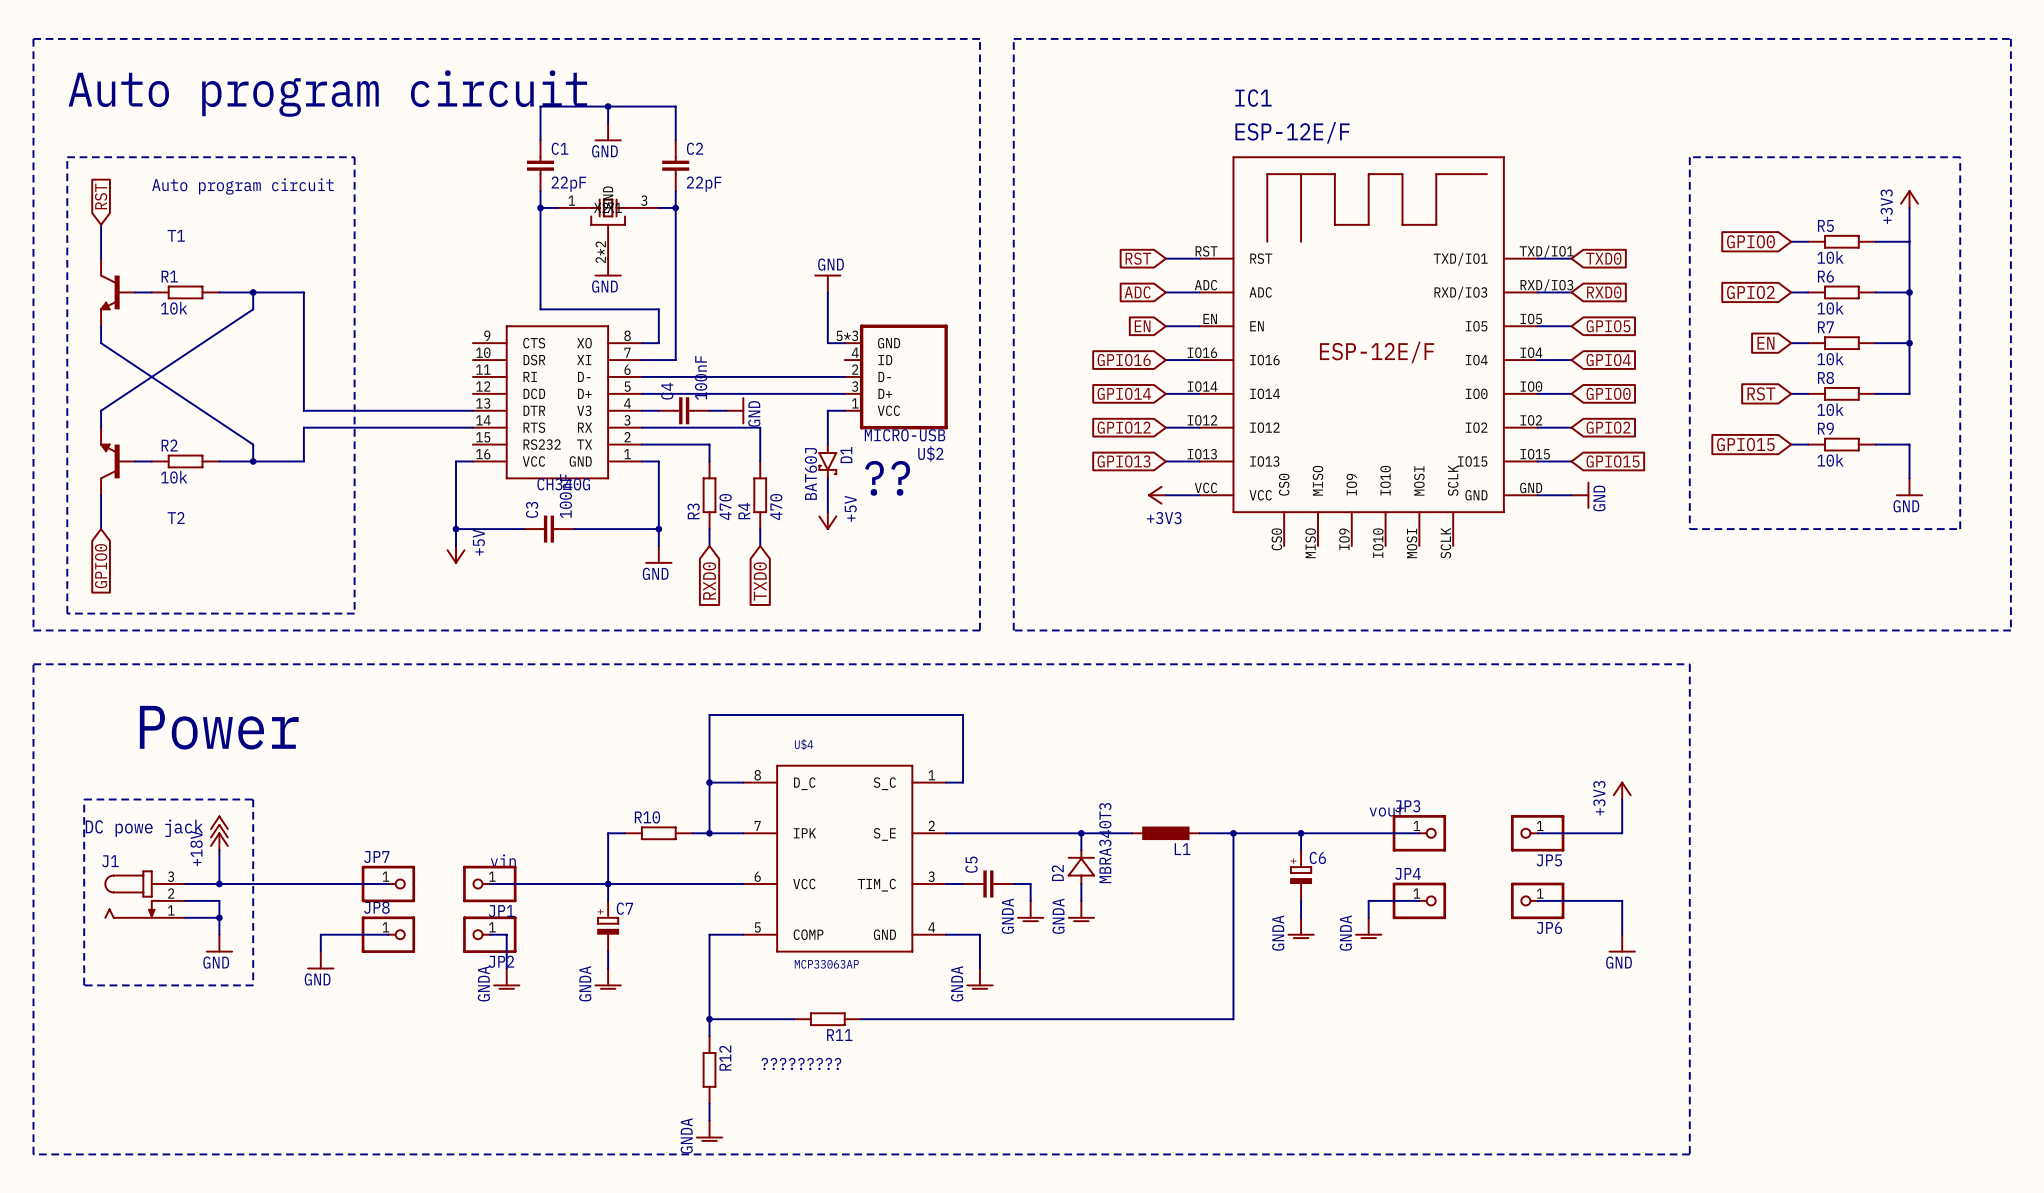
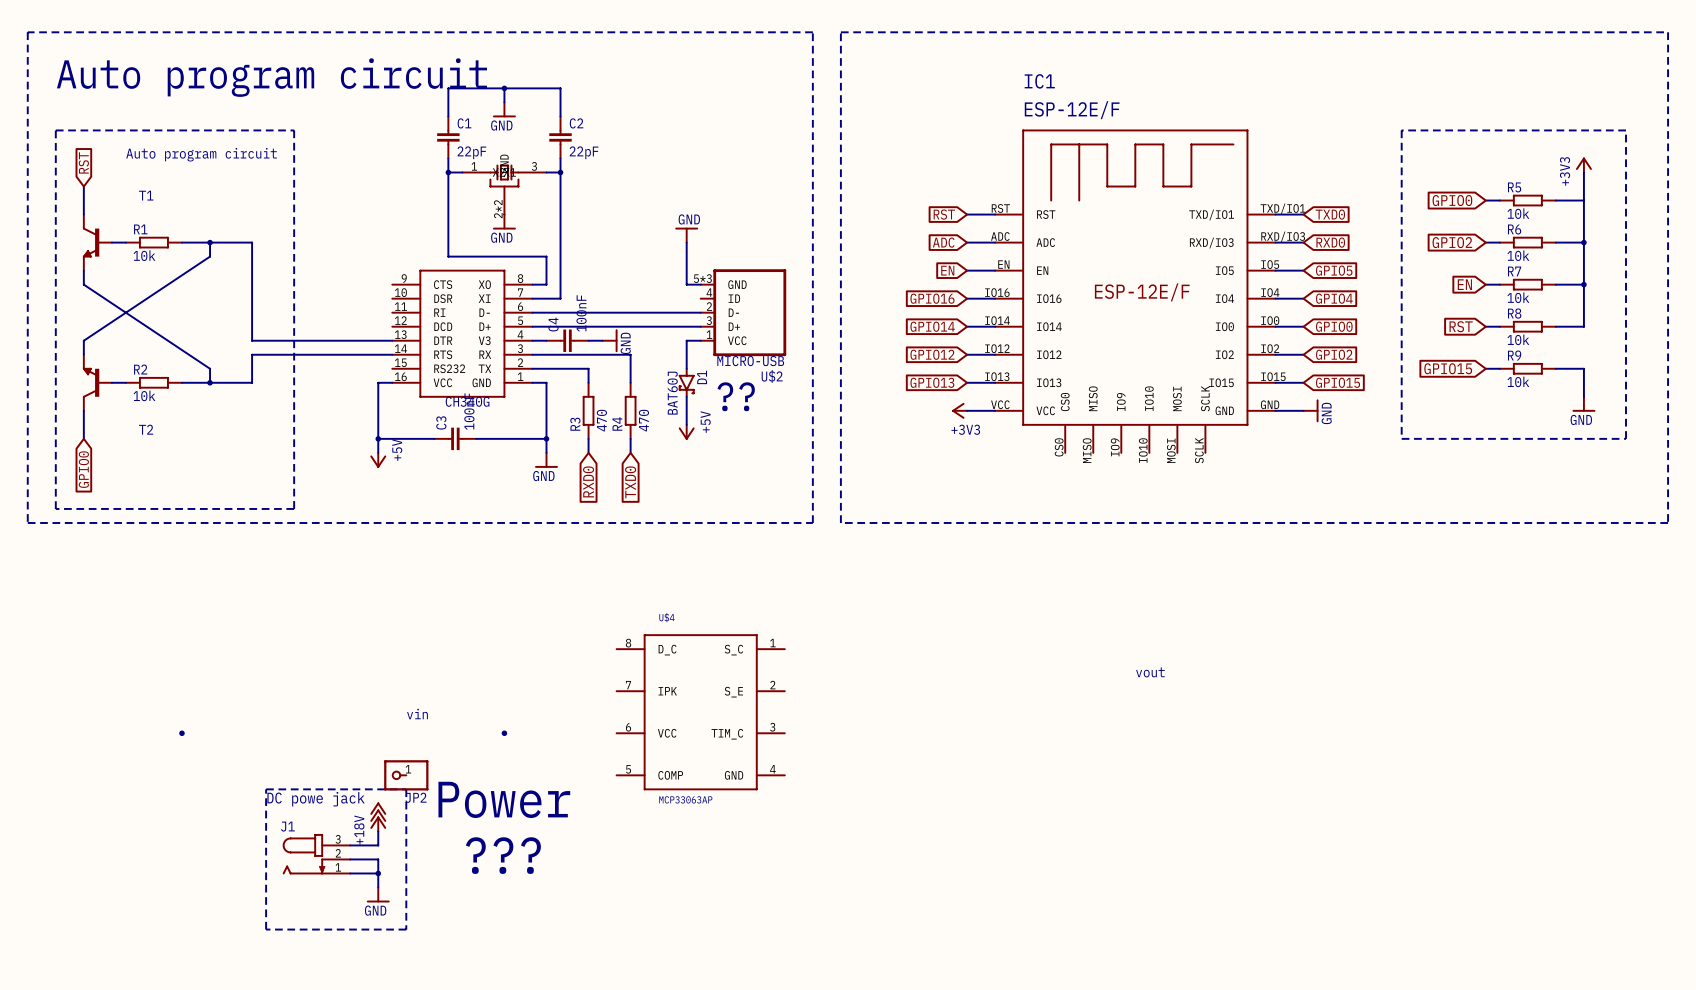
line: (33, 664) (1689, 664) (1689, 1154) (33, 1154) (33, 664) -> none
text: Power (219, 727) -> none
wire: (709, 782) (743, 782) -> none
junction: (709, 782) -> none
wire: (946, 782) (963, 782) (963, 714) (709, 714) (709, 833) -> none
power symbol: +3V3 (1622, 790) -> none
line: (84, 799) (253, 799) (253, 985) (84, 985) (84, 799) -> none
wire: (1622, 799) (1622, 833) (1537, 833) -> none
text: DC powe jack (144, 828) -> none
power symbol: +18V (219, 832) -> none
wire: (625, 833) (608, 833) (608, 900) -> none
R10: (658, 833) -> none
wire: (692, 833) (743, 833) -> none
junction: (709, 833) -> none
wire: (946, 833) (1132, 833) -> none
wire: (1081, 833) (1081, 850) -> none
junction: (1081, 833) -> none
L1: (1165, 833) -> none
wire: (1199, 833) (1419, 833) -> none
wire: (1233, 833) (1233, 1019) (861, 1019) -> none
junction: (1233, 833) -> none
wire: (1301, 833) (1301, 850) -> none
junction: (1301, 833) -> none
JP3: (1419, 833) -> none
JP5: (1537, 833) -> none
wire: (219, 850) (219, 884) -> none
D2: MBRA340T3 (1081, 867) -> none
C6: (1301, 875) -> none
wire: (185, 884) (388, 884) -> none
JP7: (388, 884) -> none
wire: (489, 884) (743, 884) -> none
JP1: (489, 884) -> none
wire: (946, 884) (963, 884) -> none
C5: (988, 884) -> none
wire: (1013, 884) (1030, 884) (1030, 900) -> none
wire: (1081, 884) (1081, 900) -> none
J1 position: (145, 894) -> (316, 854)
wire: (185, 900) (219, 900) (219, 934) -> none
wire: (1301, 900) (1301, 917) -> none
wire: (1419, 900) (1368, 900) (1368, 917) -> none
JP4: (1419, 900) -> none
wire: (1537, 900) (1622, 900) (1622, 934) -> none
JP6: (1537, 900) -> none
power symbol: GNDA (1030, 911) -> none
power symbol: GNDA (1081, 911) -> none
wire: (185, 917) (219, 917) -> none
junction: (219, 917) -> none
C7: (608, 926) -> none
power symbol: GNDA (1301, 928) -> none
power symbol: GNDA (1368, 928) -> none
wire: (388, 934) (320, 934) (320, 951) -> none
JP8: (388, 934) -> none
wire: (489, 934) (506, 934) (506, 968) -> none
wire: (743, 934) (709, 934) (709, 1036) -> none
wire: (946, 934) (979, 934) (979, 968) -> none
power symbol: GND (219, 943) -> none
power symbol: GND (1622, 943) -> none
line: none -> (266, 789) (406, 789) (406, 929) (266, 929) (266, 789)
power symbol: GND (320, 960) -> none
text: none -> DC powe jack (316, 799)
text: none -> Power (504, 799)
power symbol: GNDA (506, 979) -> none
power symbol: GNDA (608, 979) -> none
power symbol: GNDA (979, 979) -> none
power symbol: none -> +18V (378, 817)
wire: none -> (378, 831) (378, 845) (350, 845)
wire: (709, 1019) (794, 1019) -> none
junction: (709, 1019) -> none
R11: (827, 1019) -> none
text: none -> ??? (503, 855)
wire: none -> (350, 859) (378, 859) (378, 887)
wire: none -> (350, 873) (378, 873)
junction: none -> (378, 873)
text: ????????? (801, 1063) -> none
R12: (709, 1069) -> none
power symbol: none -> GND (378, 894)
wire: (709, 1103) (709, 1120) -> none
power symbol: GNDA (709, 1131) -> none

